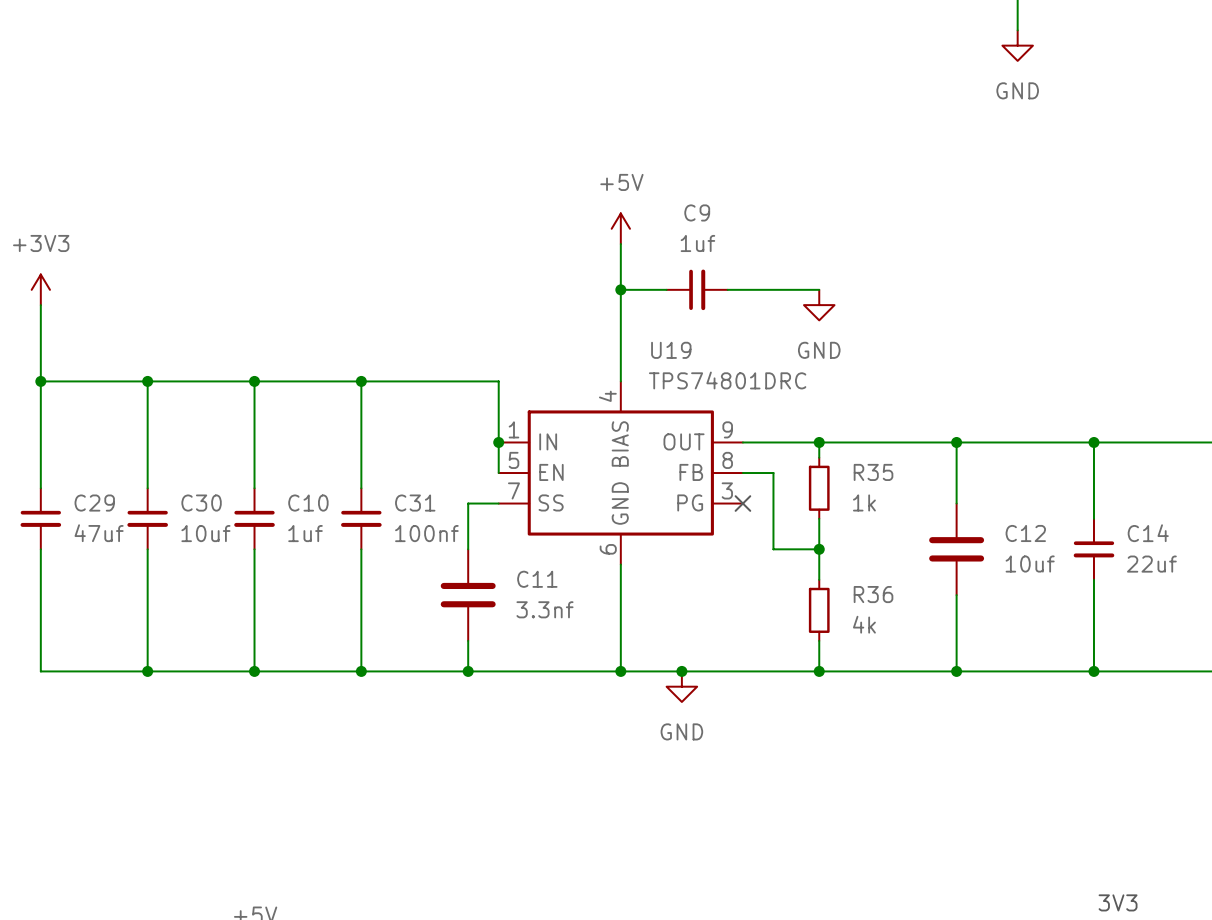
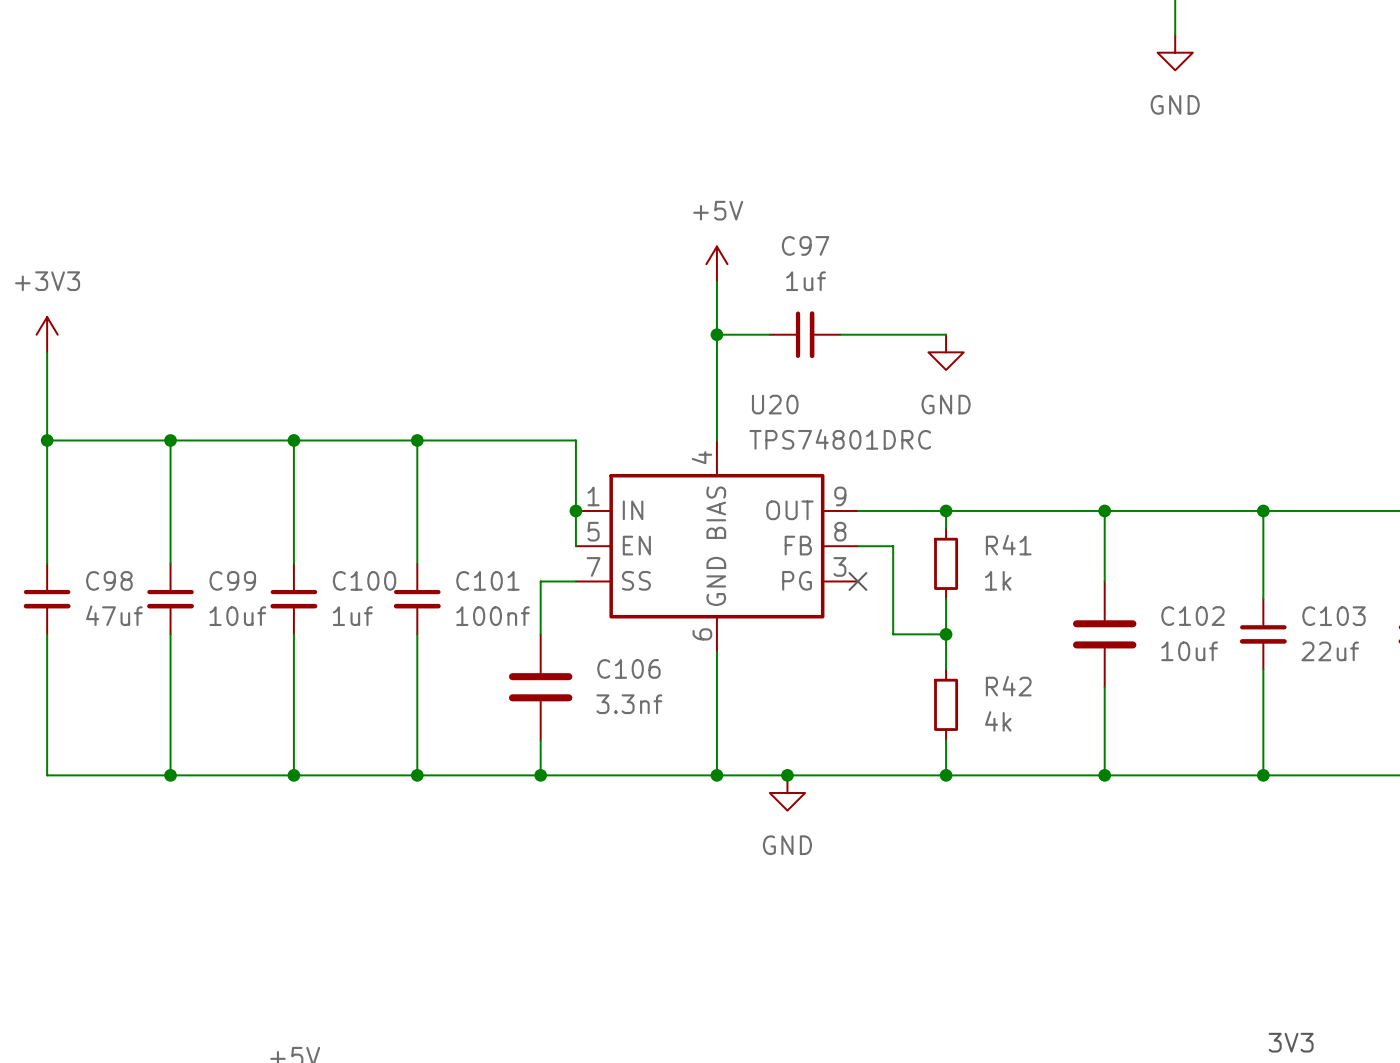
C9 name: C9 (697, 212) -> C97 (805, 245)
U19 name: U19 (671, 350) -> U20 (775, 404)
R35 name: R35 (873, 472) -> R41 (1008, 545)
C29 name: C29 (94, 503) -> C98 (109, 580)
C30 name: C30 (201, 503) -> C99 (232, 580)
C10 name: C10 (308, 503) -> C100 (364, 580)
C31 name: C31 (415, 503) -> C101 (487, 580)
C12 name: C12 (1025, 533) -> C102 (1192, 616)
C14 name: C14 (1148, 533) -> C103 (1333, 616)
C11 name: C11 (537, 579) -> C106 (628, 668)
R36 name: R36 (873, 594) -> R42 (1008, 686)

